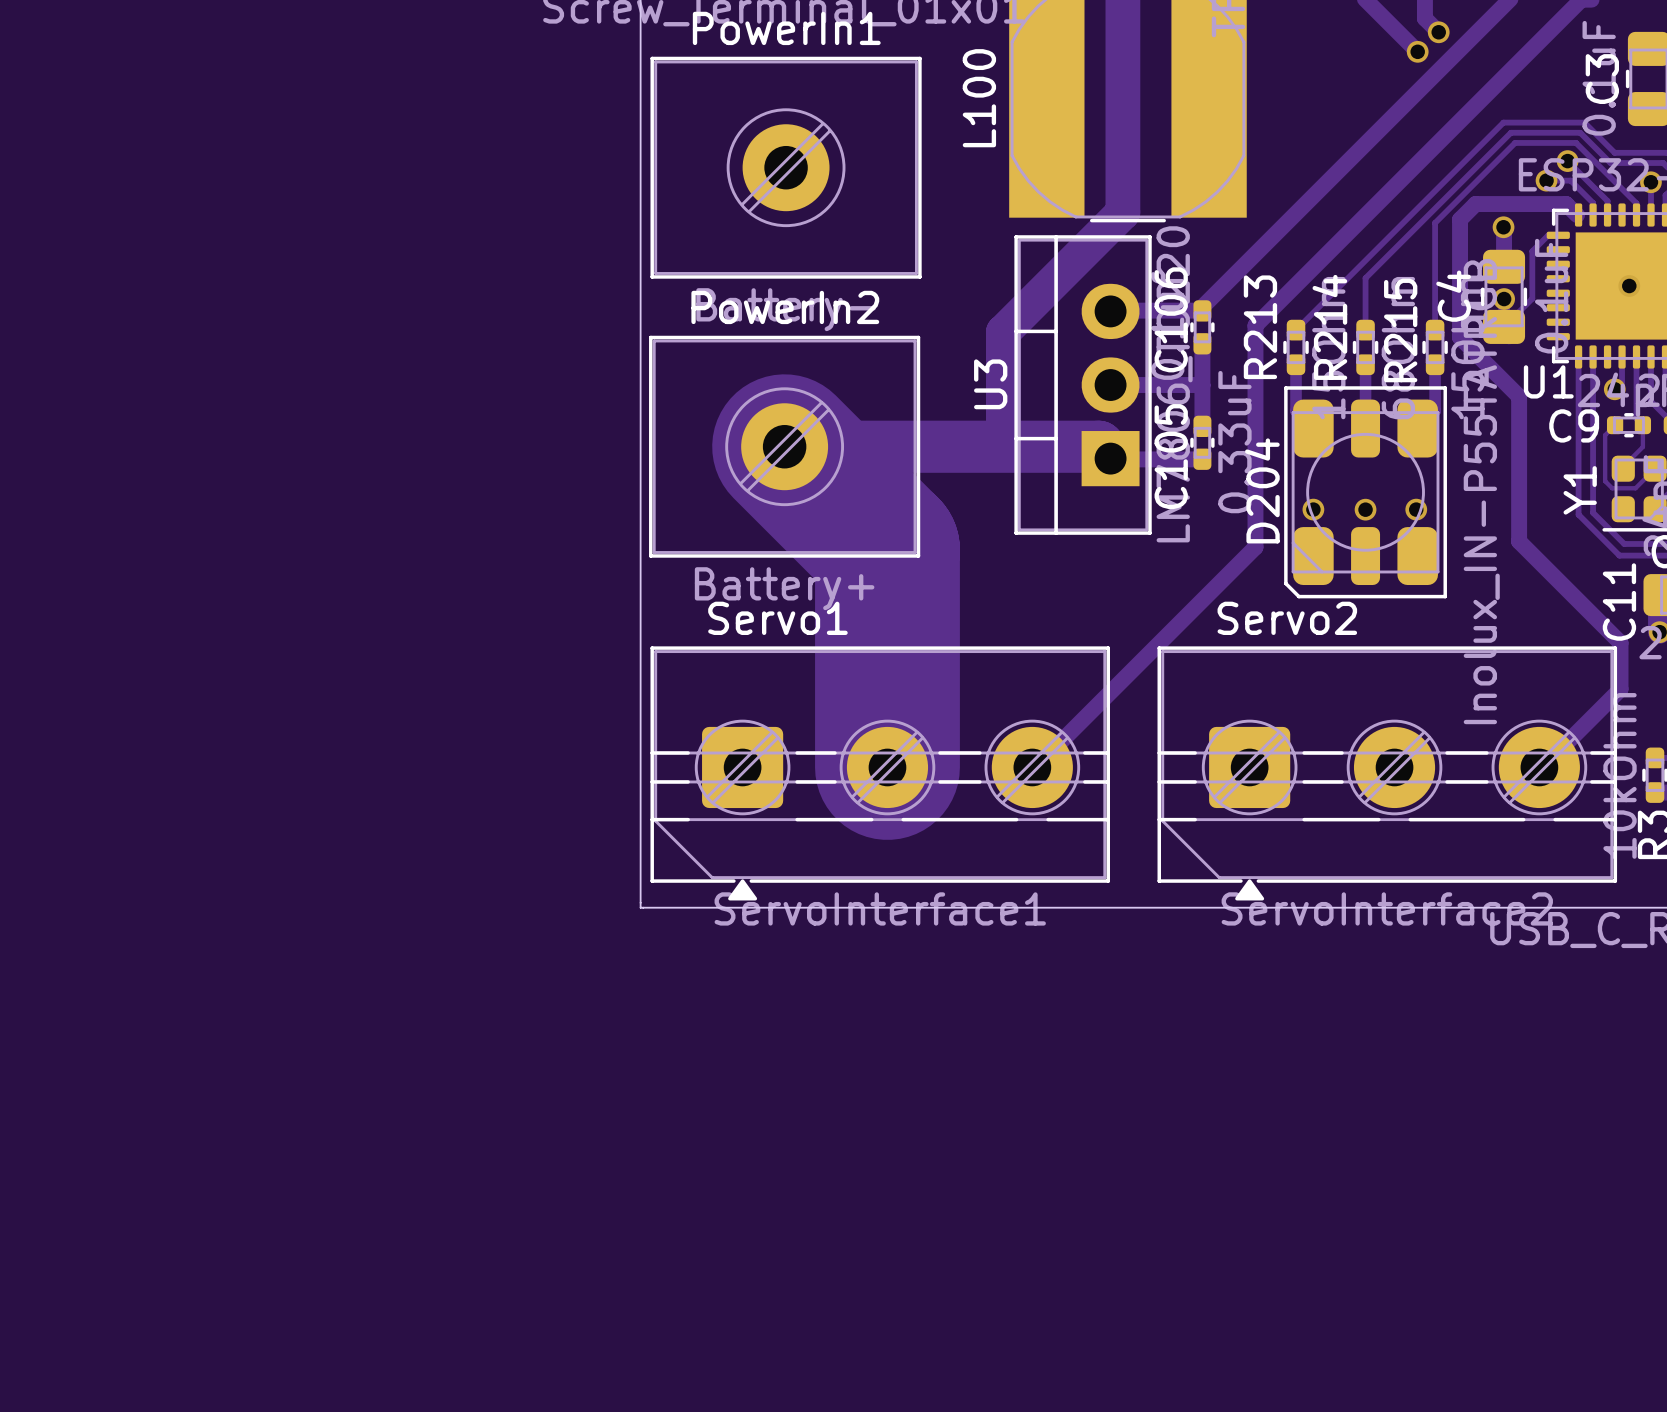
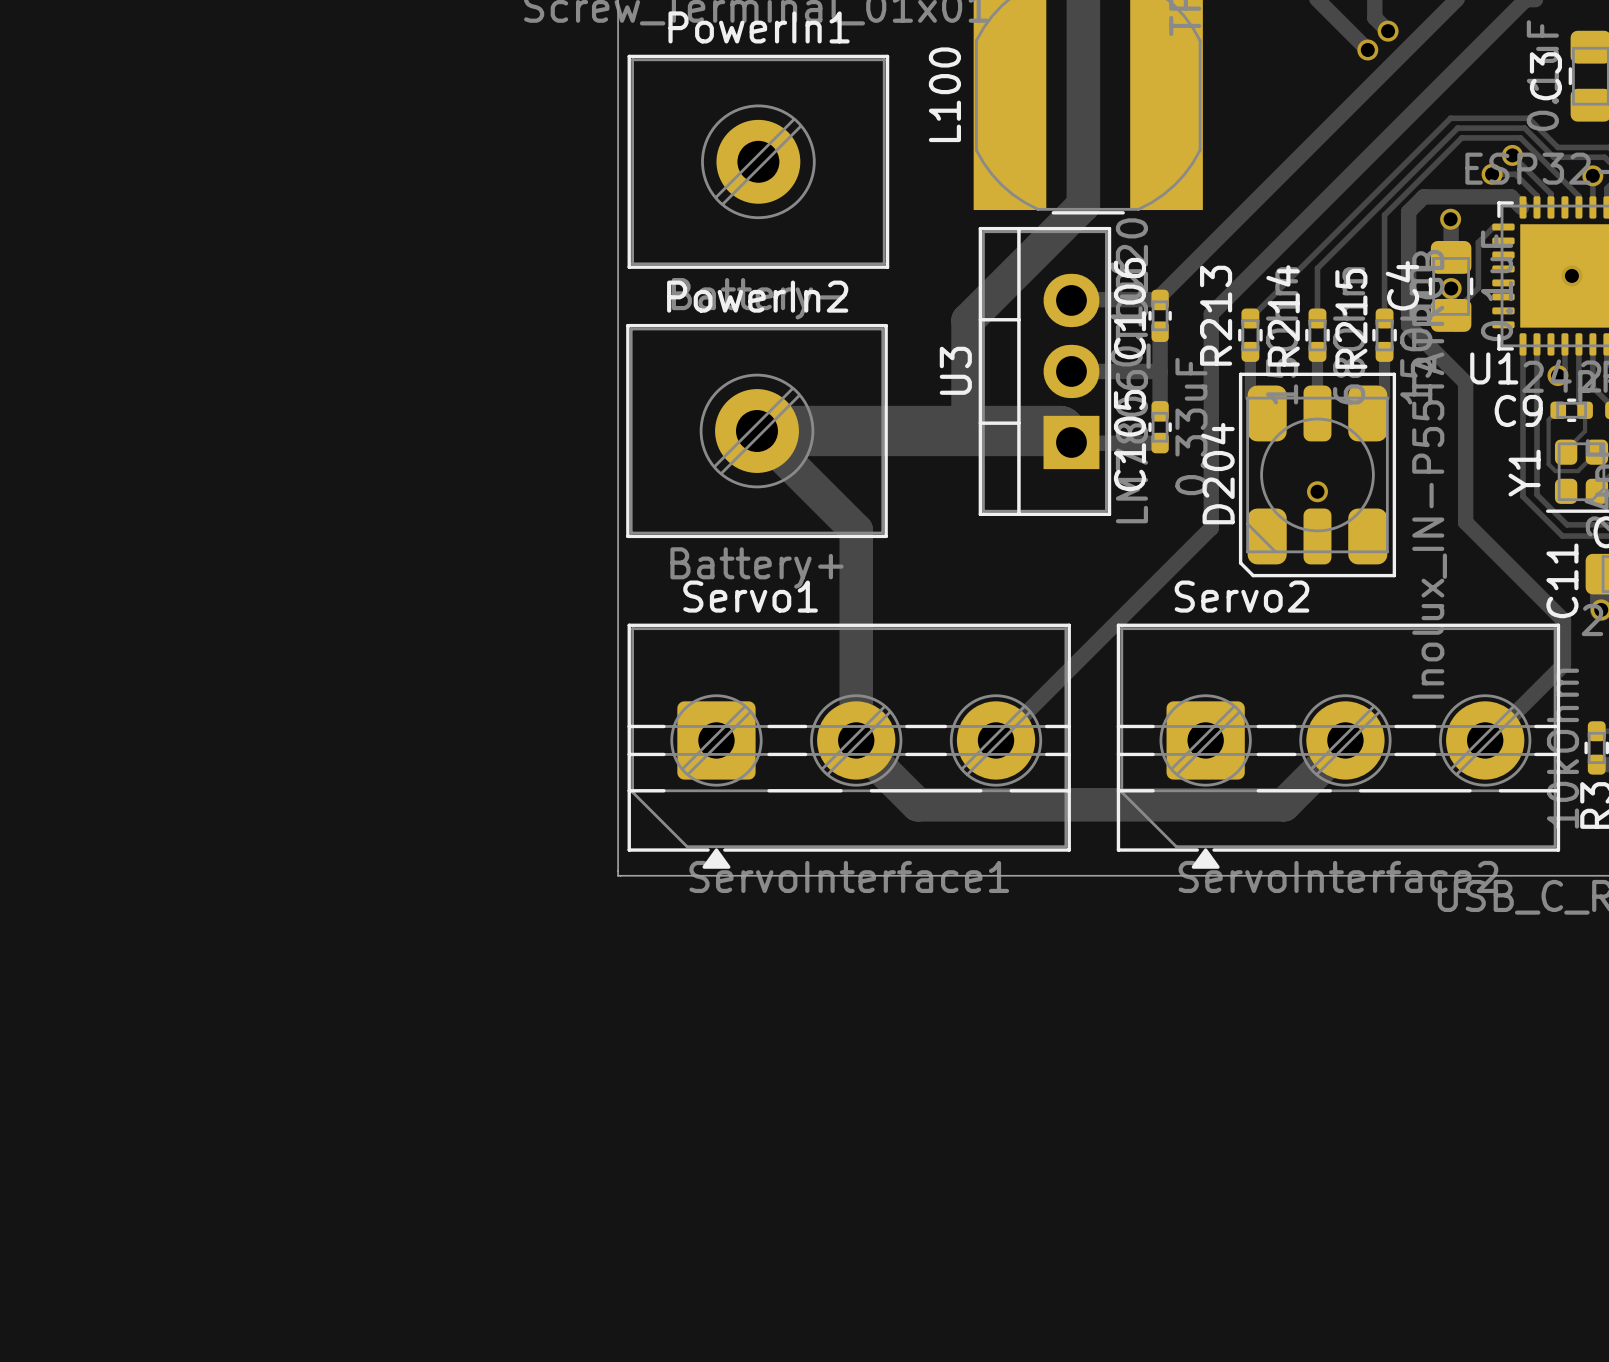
track width: thick (784, 446) (887, 549) (887, 767) -> thin (757, 431) (856, 530) (856, 740)
via: (1313, 509) -> none
via: (1416, 509) -> none
track: none -> (856, 740) (856, 743) (917, 804) (1283, 804) (1345, 743)

